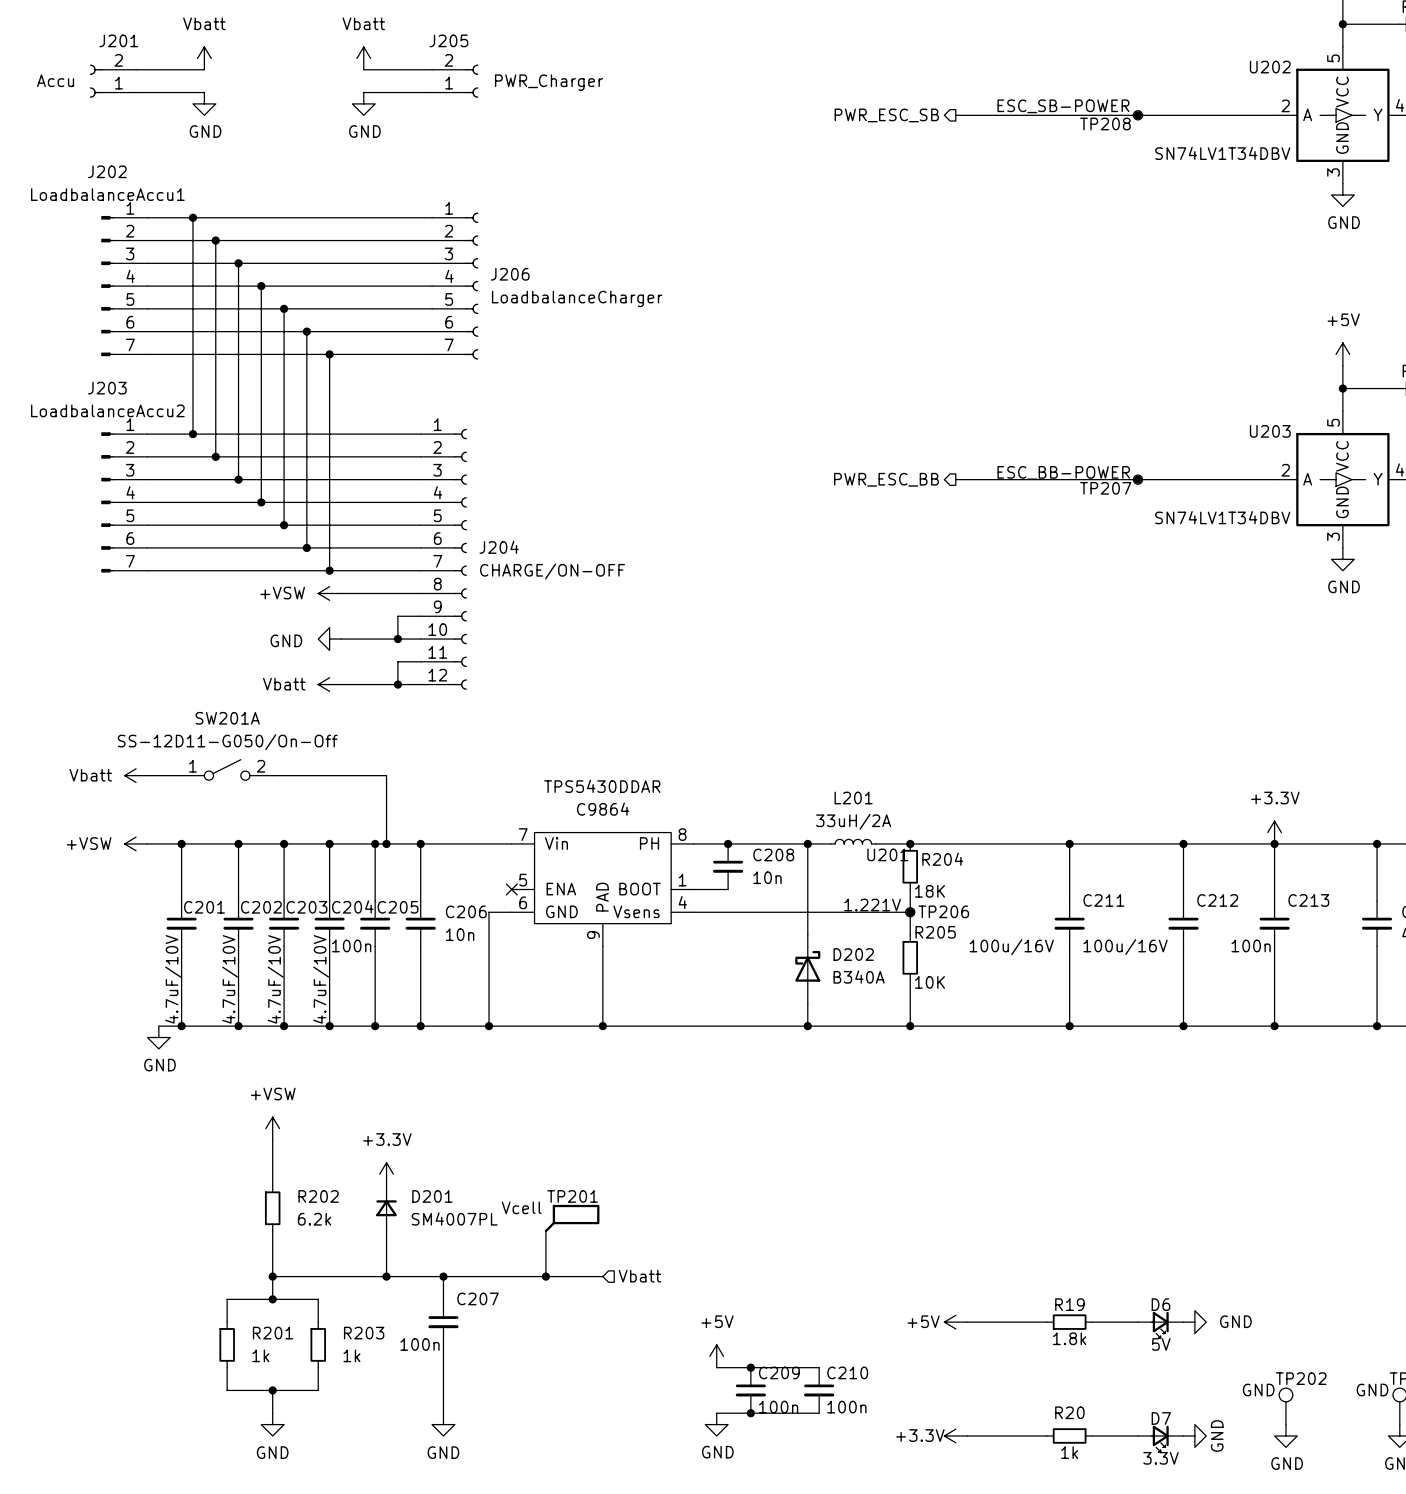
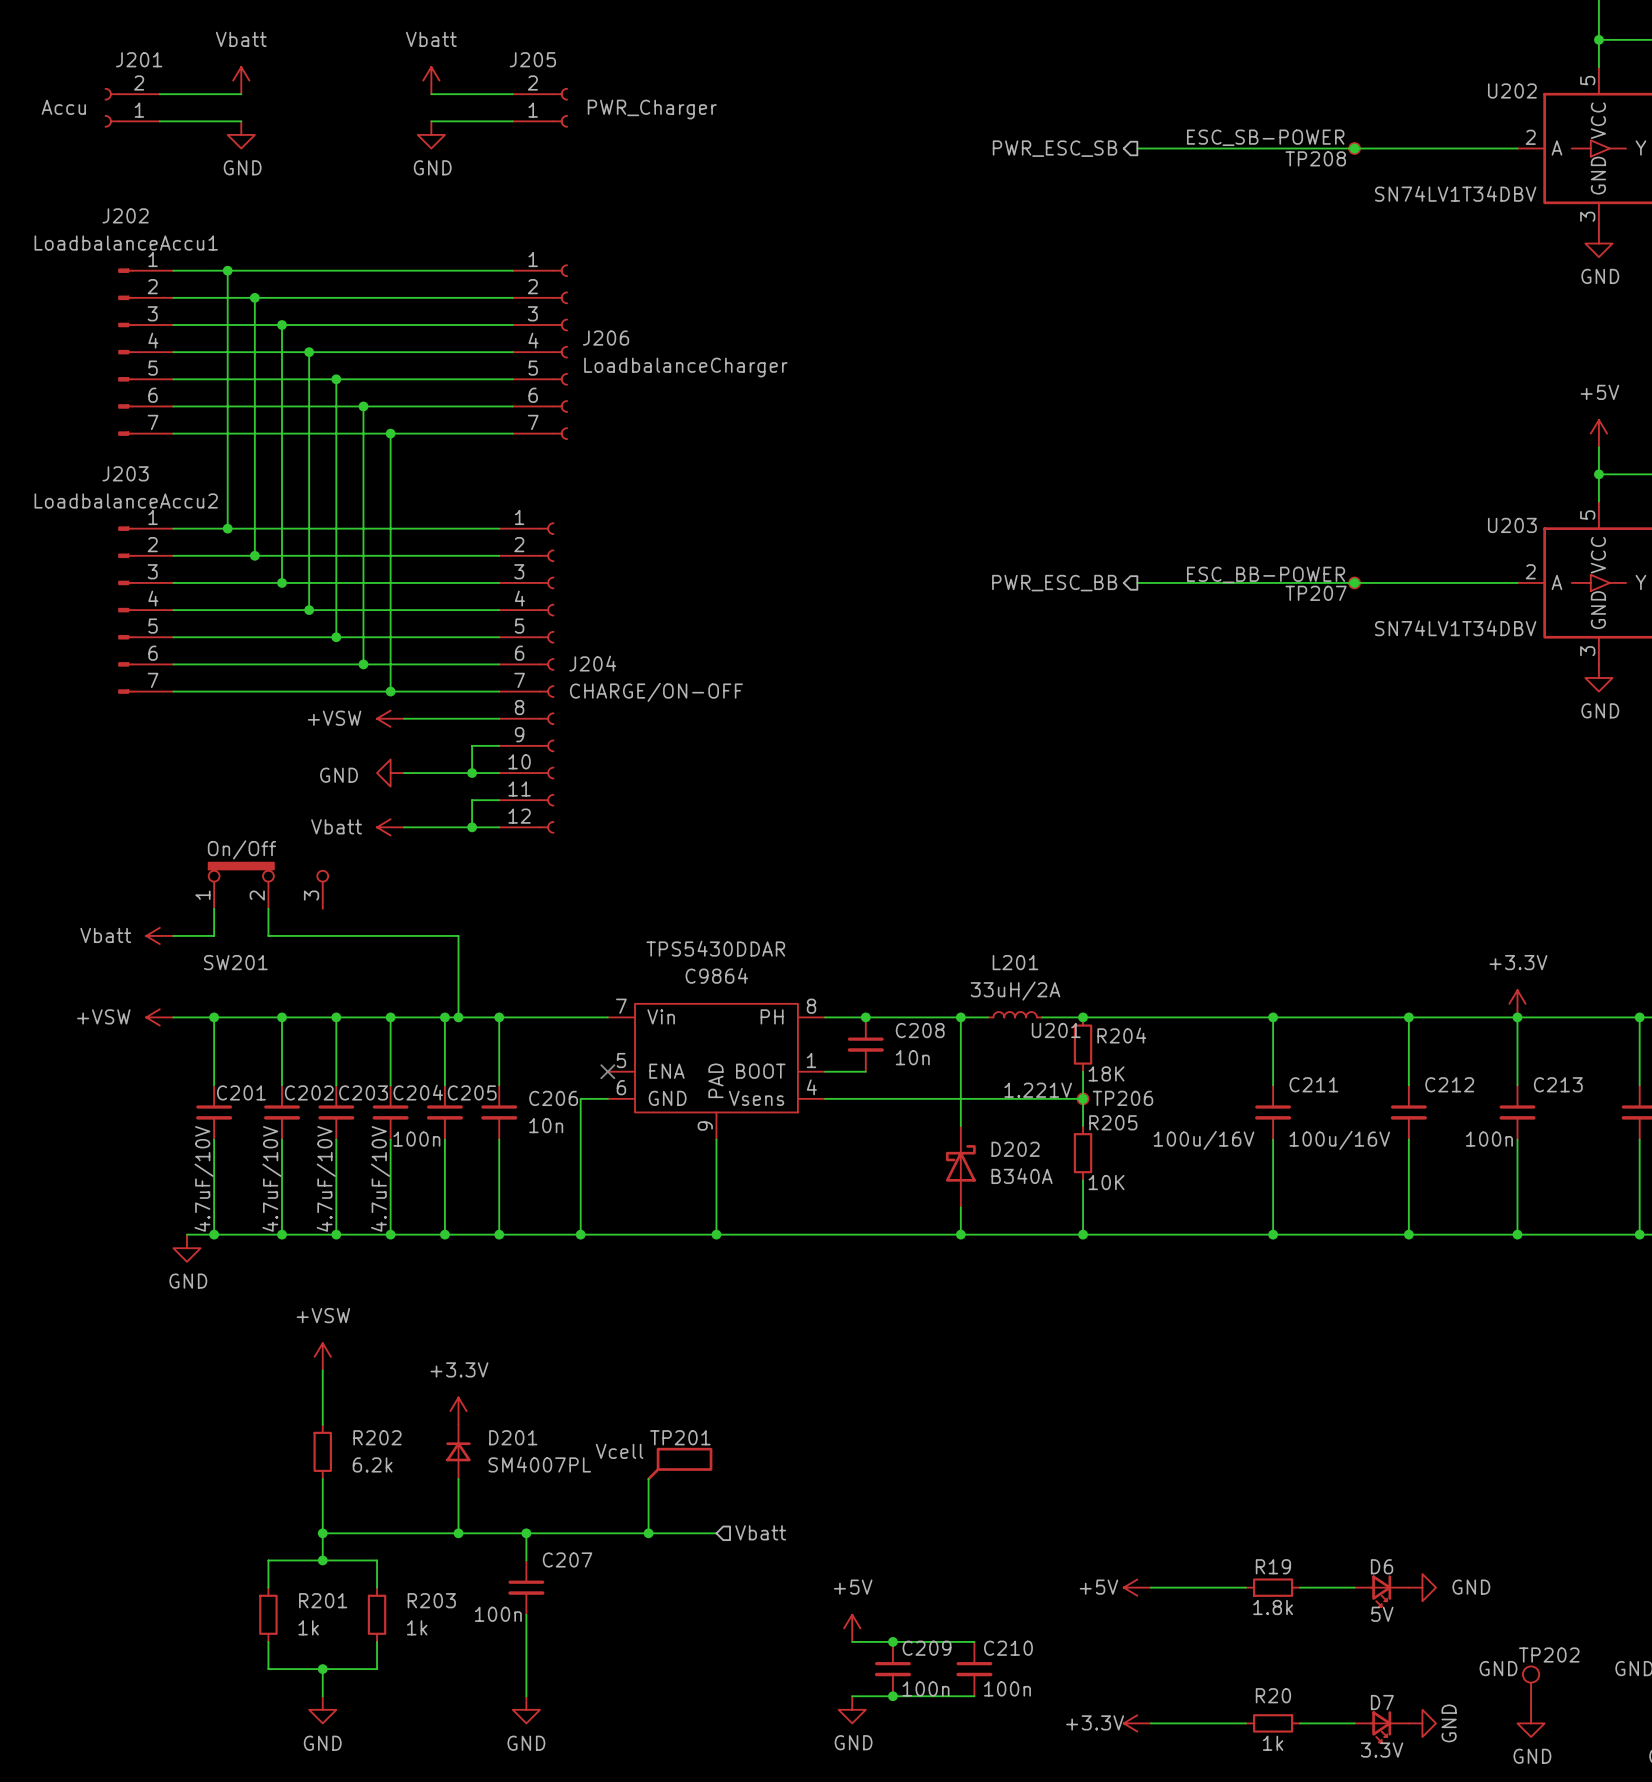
SW201: none -> On/Off (268, 885)
wire: none -> (214, 908) (214, 935)
wire: none -> (268, 908) (268, 935) (322, 935)
SW201A: SS-12D11-G050/On-Off (227, 769) -> none

